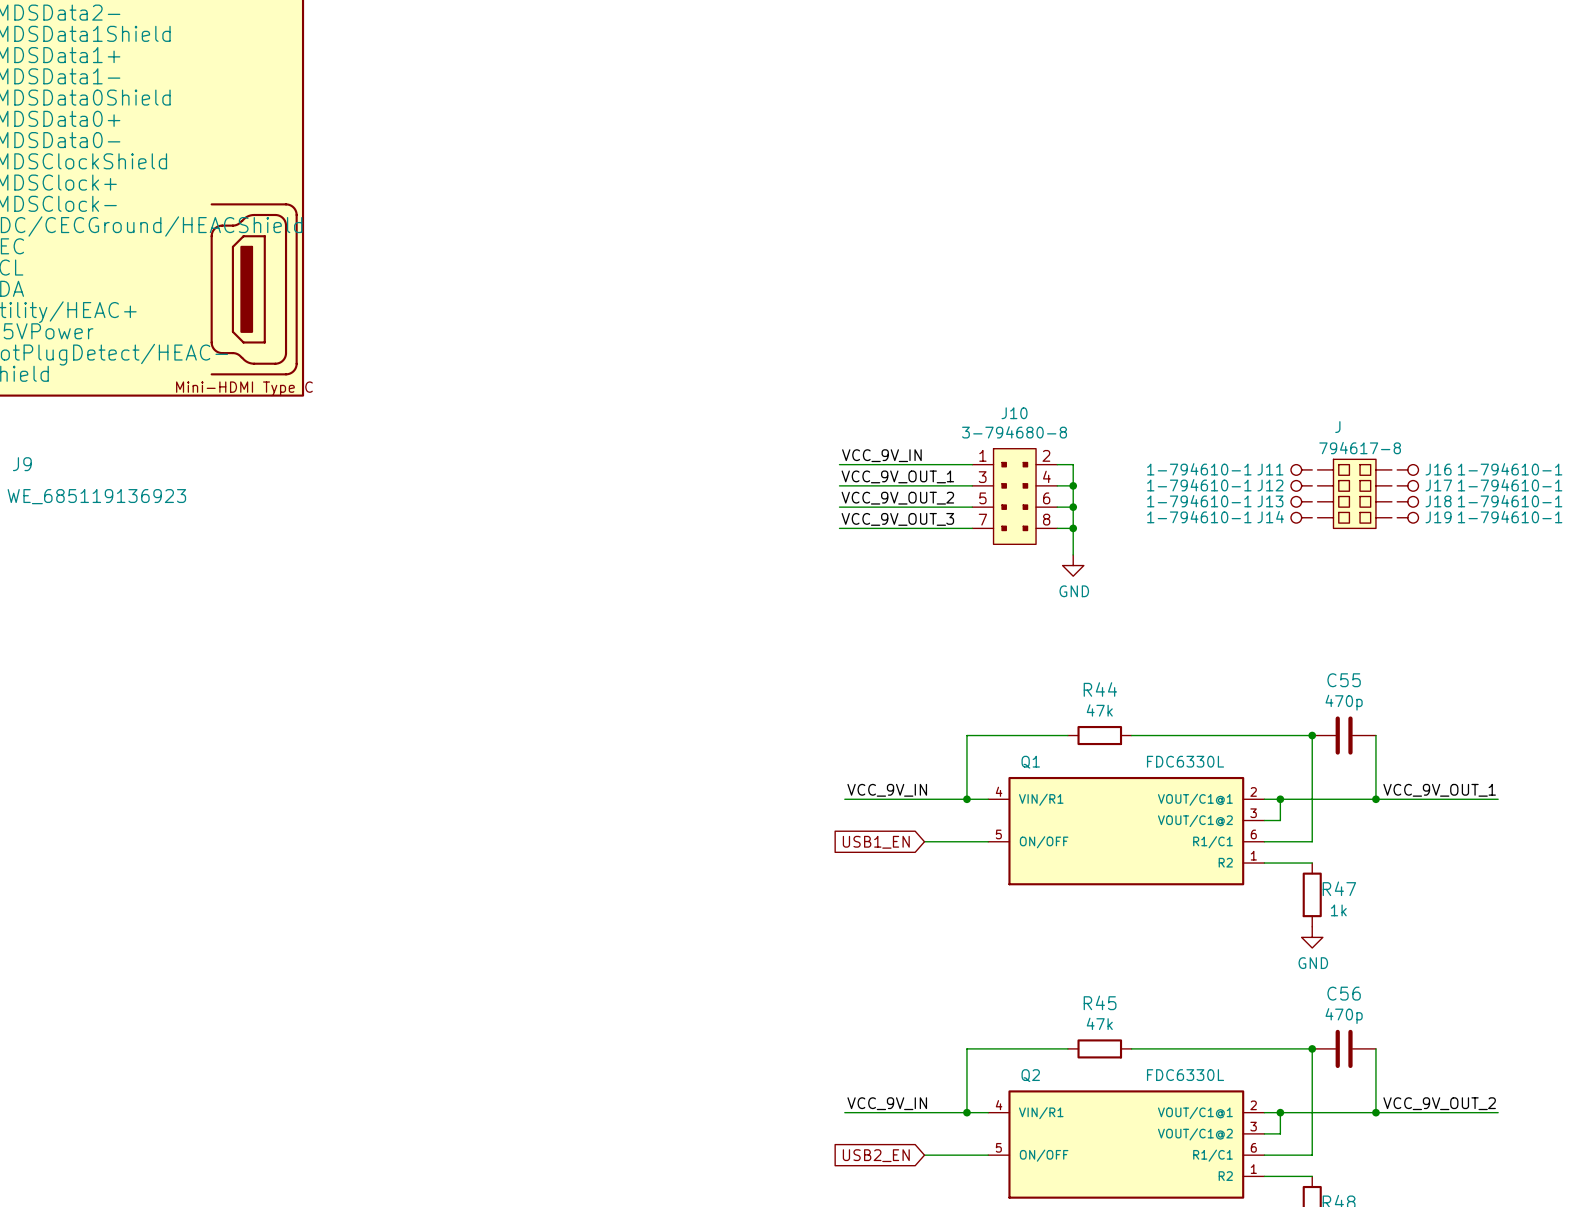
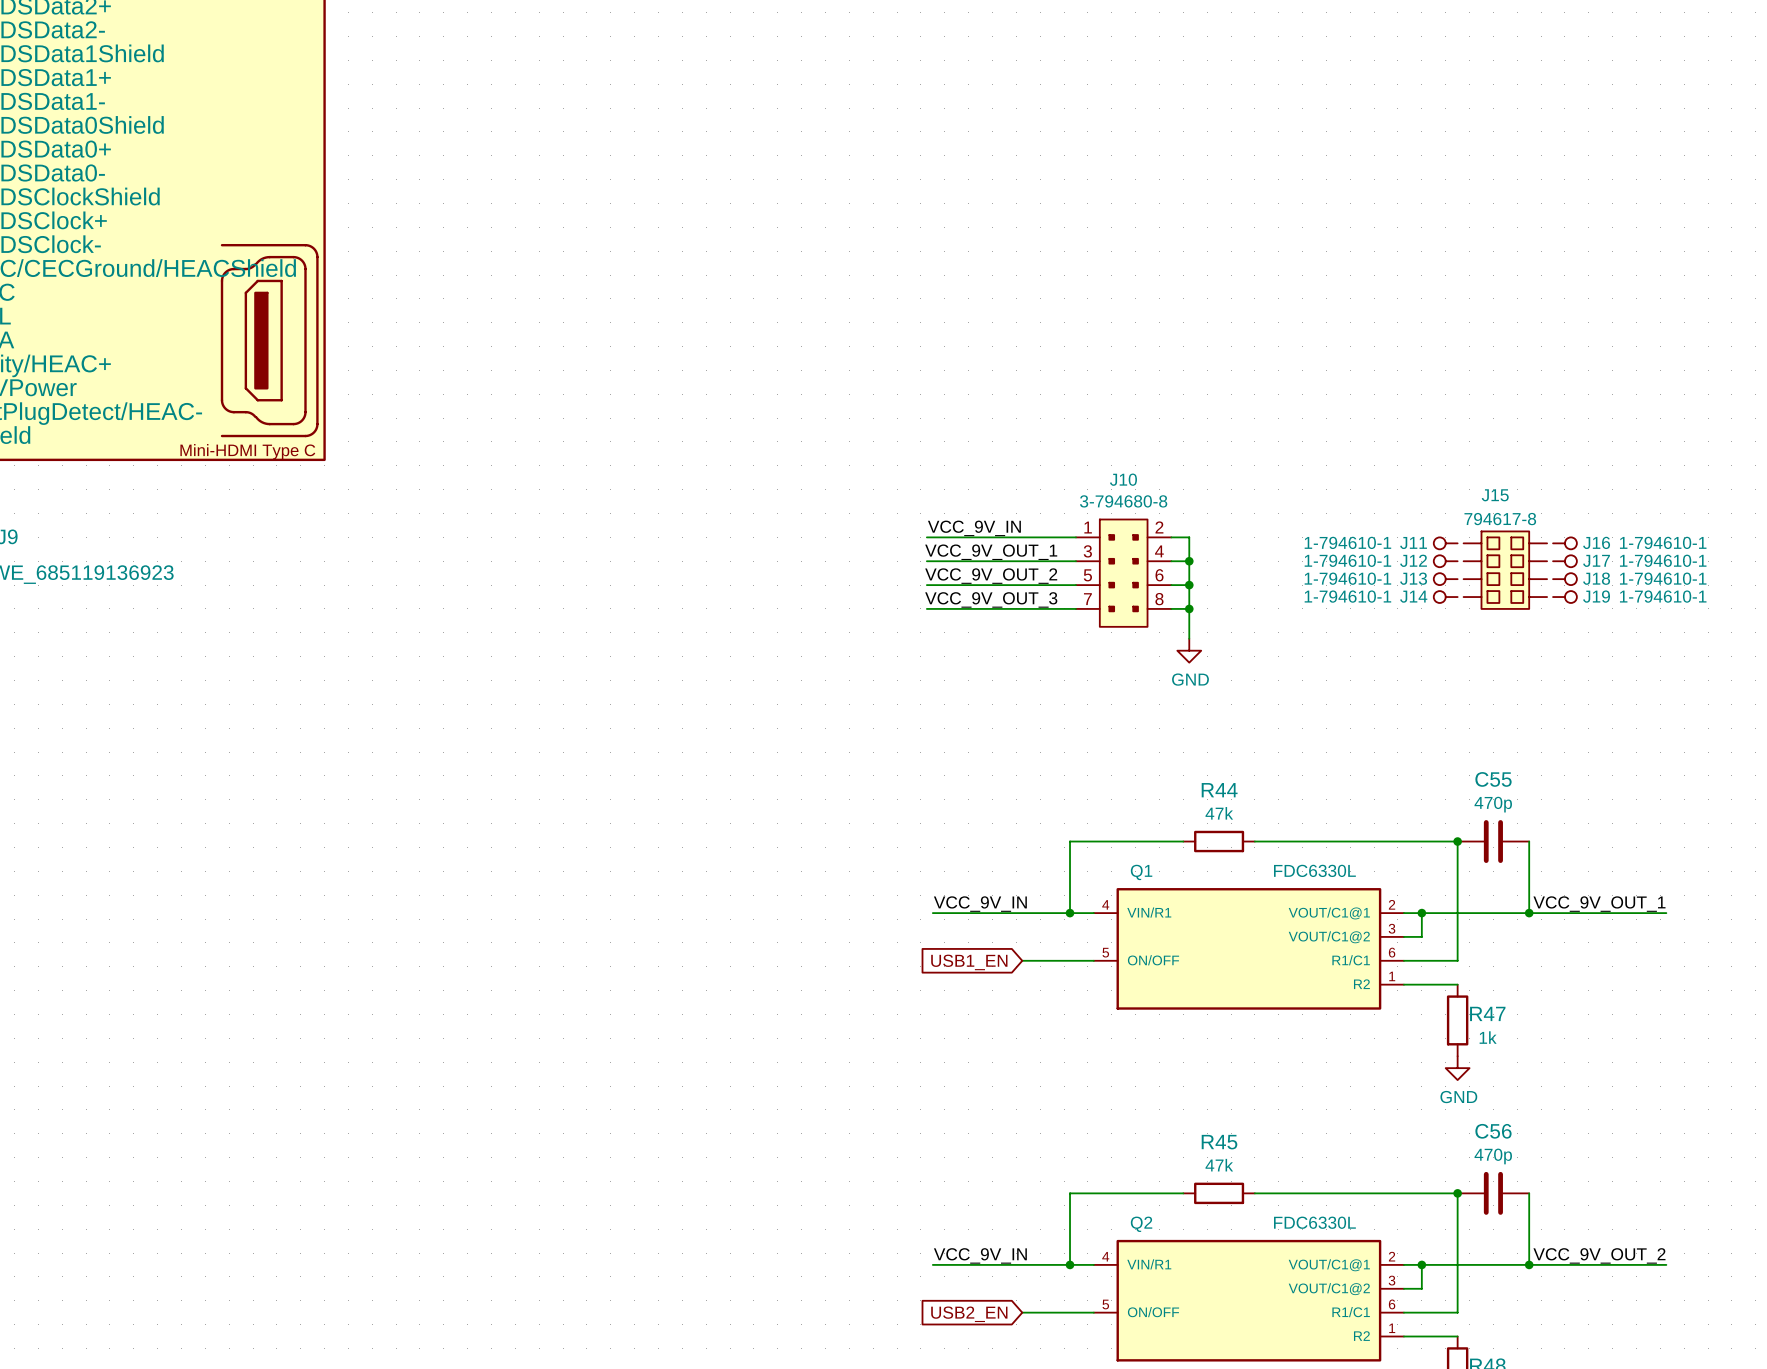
J name: J (1337, 427) -> J15 (1495, 495)

